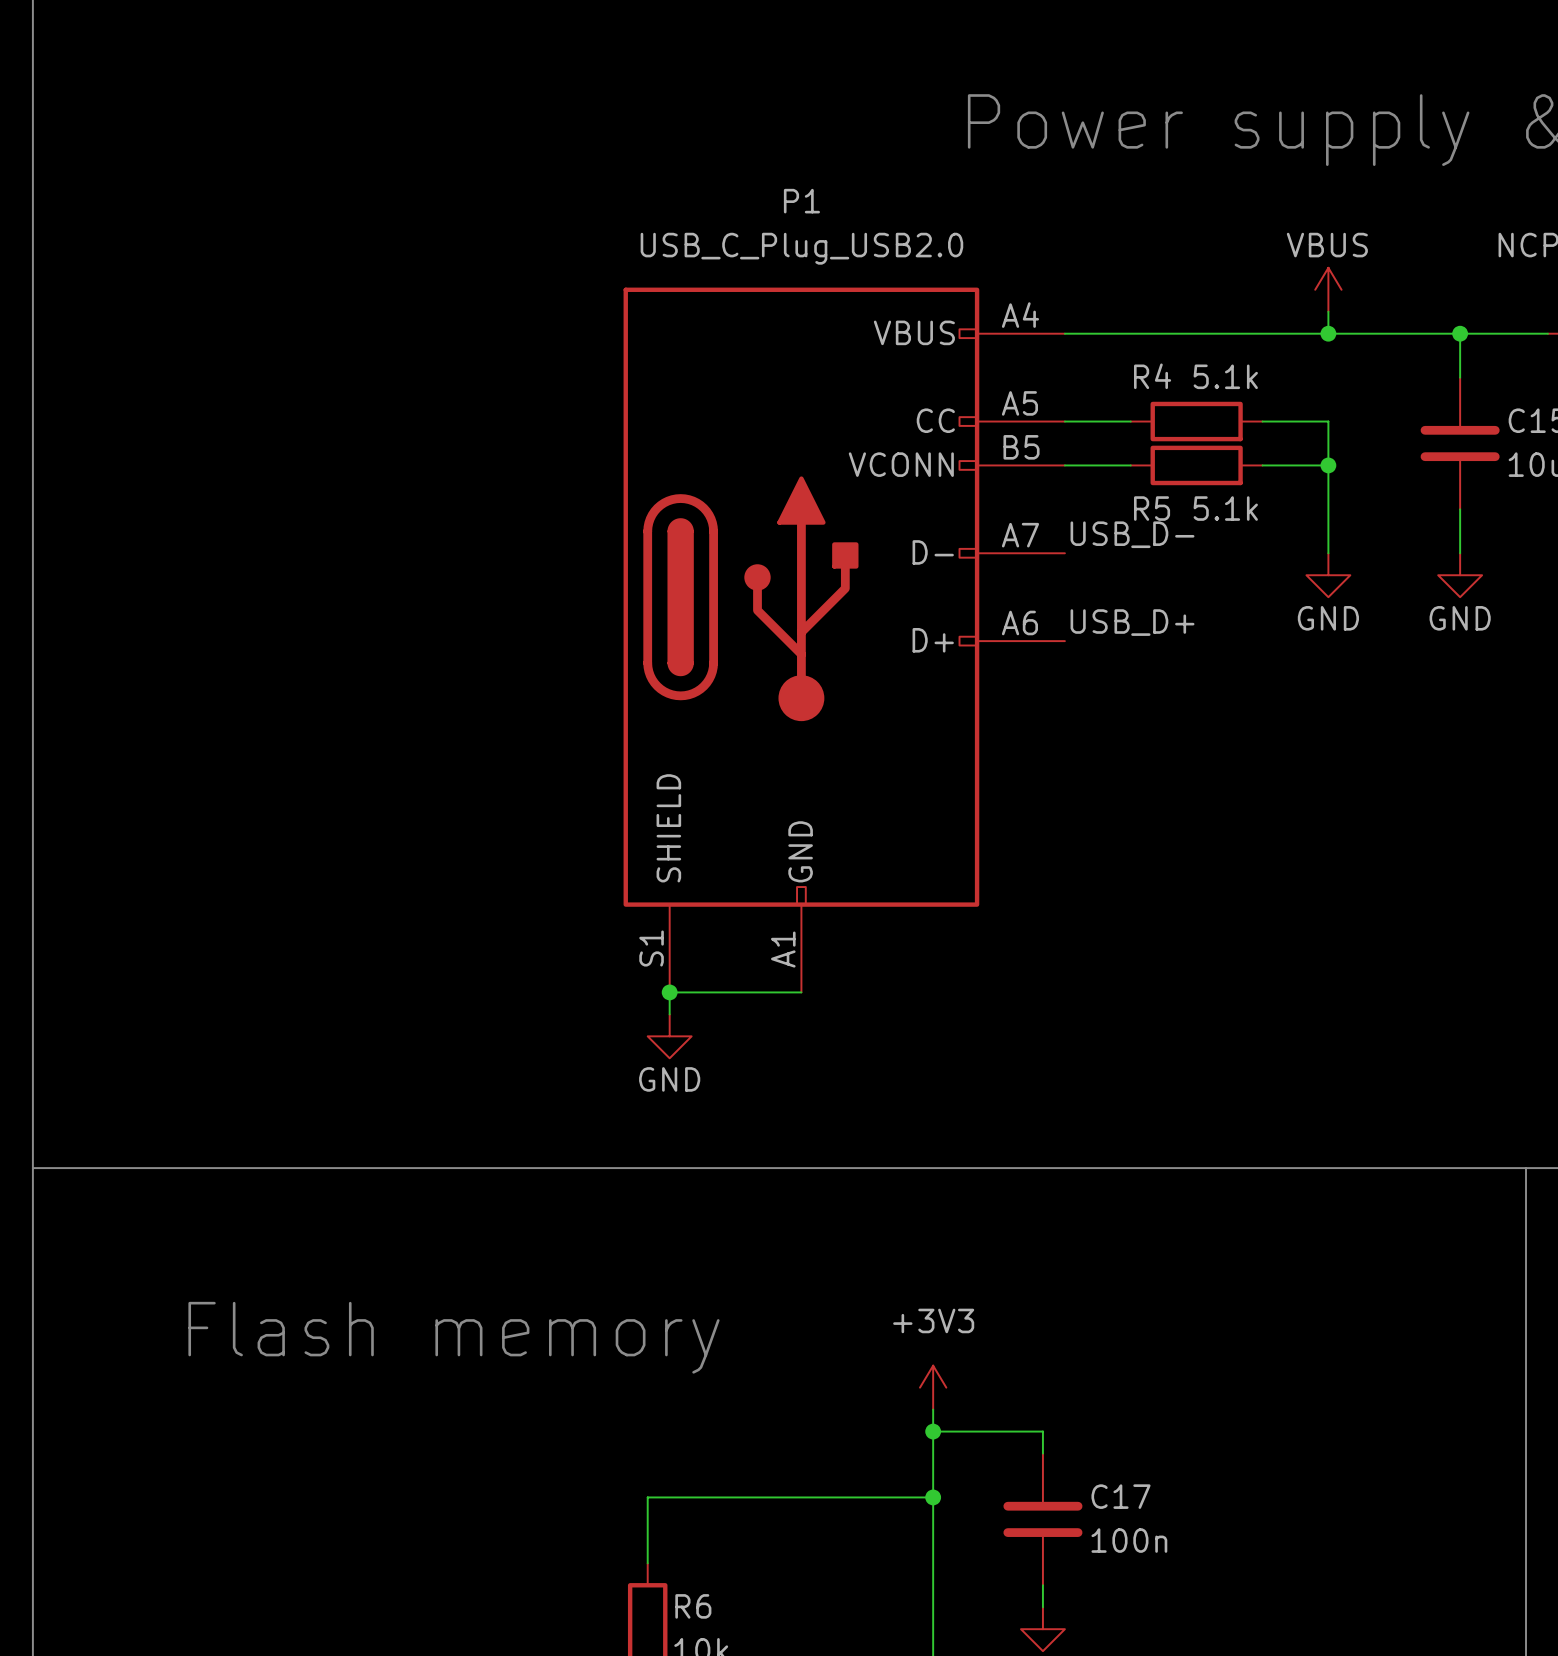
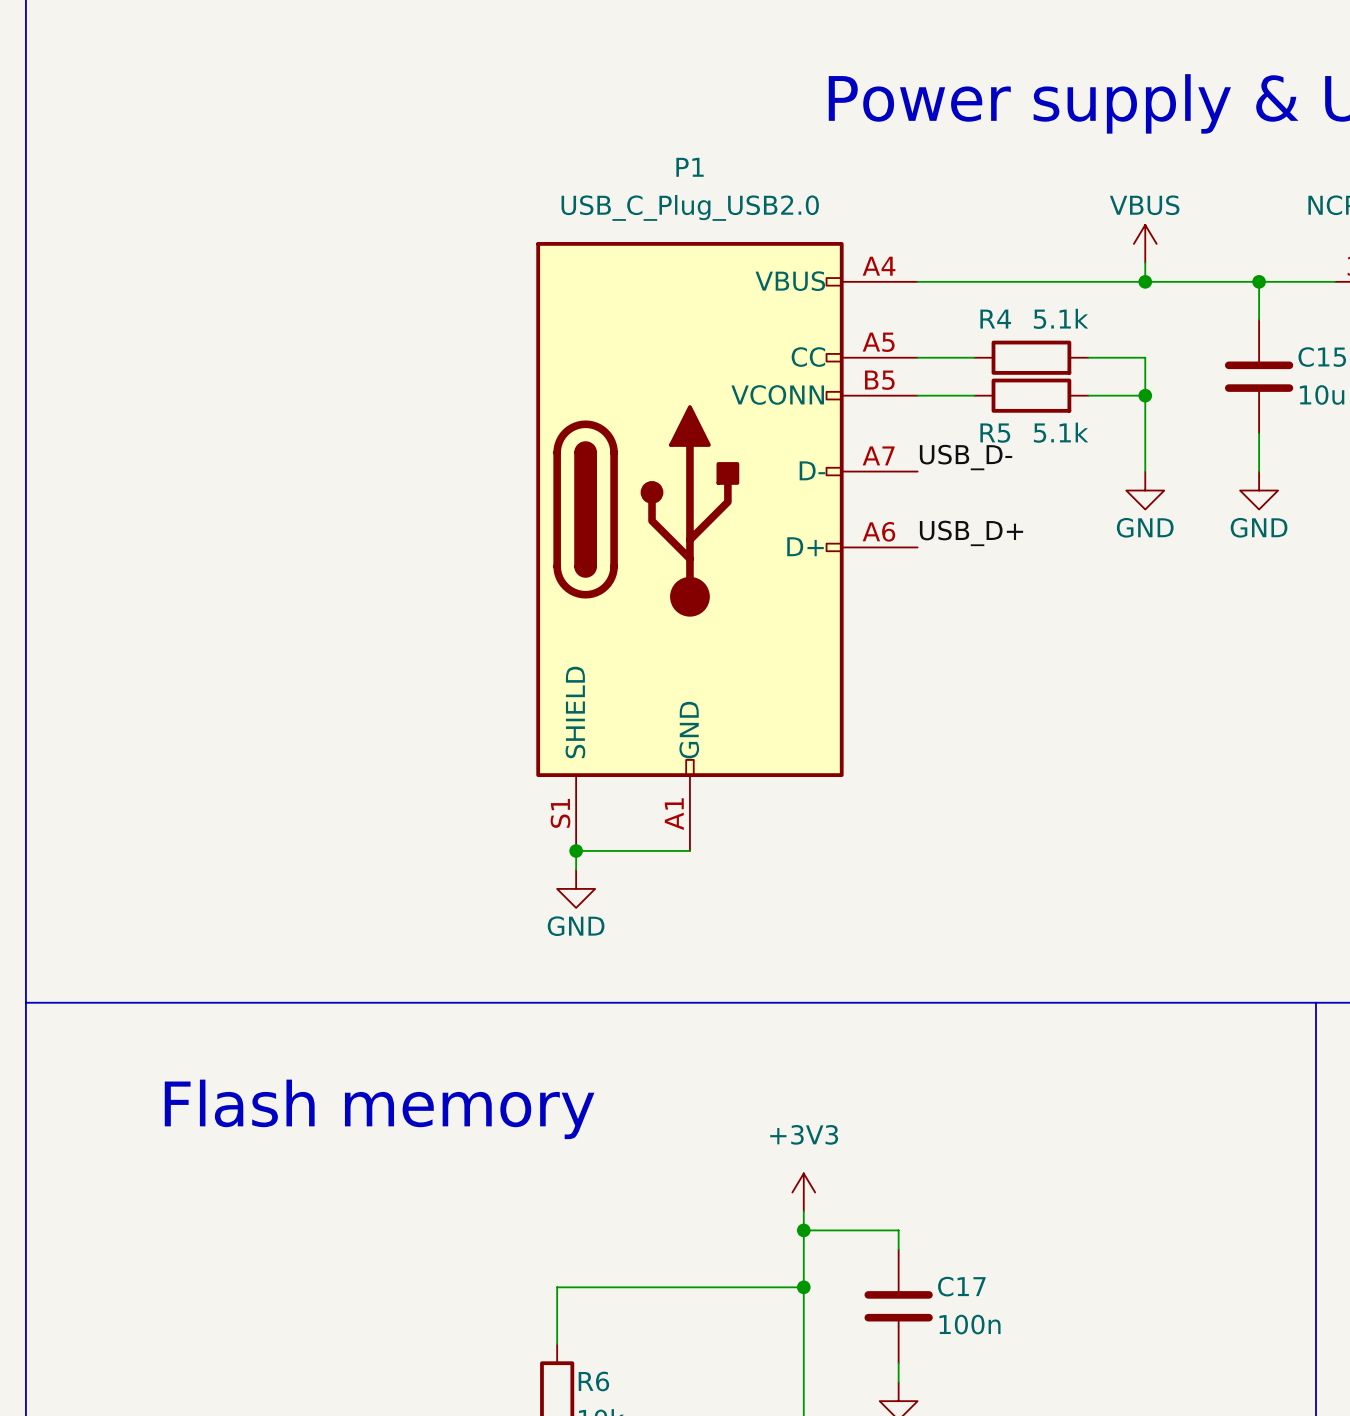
text position: Flash memory (453, 1337) -> Flash memory (379, 1109)

